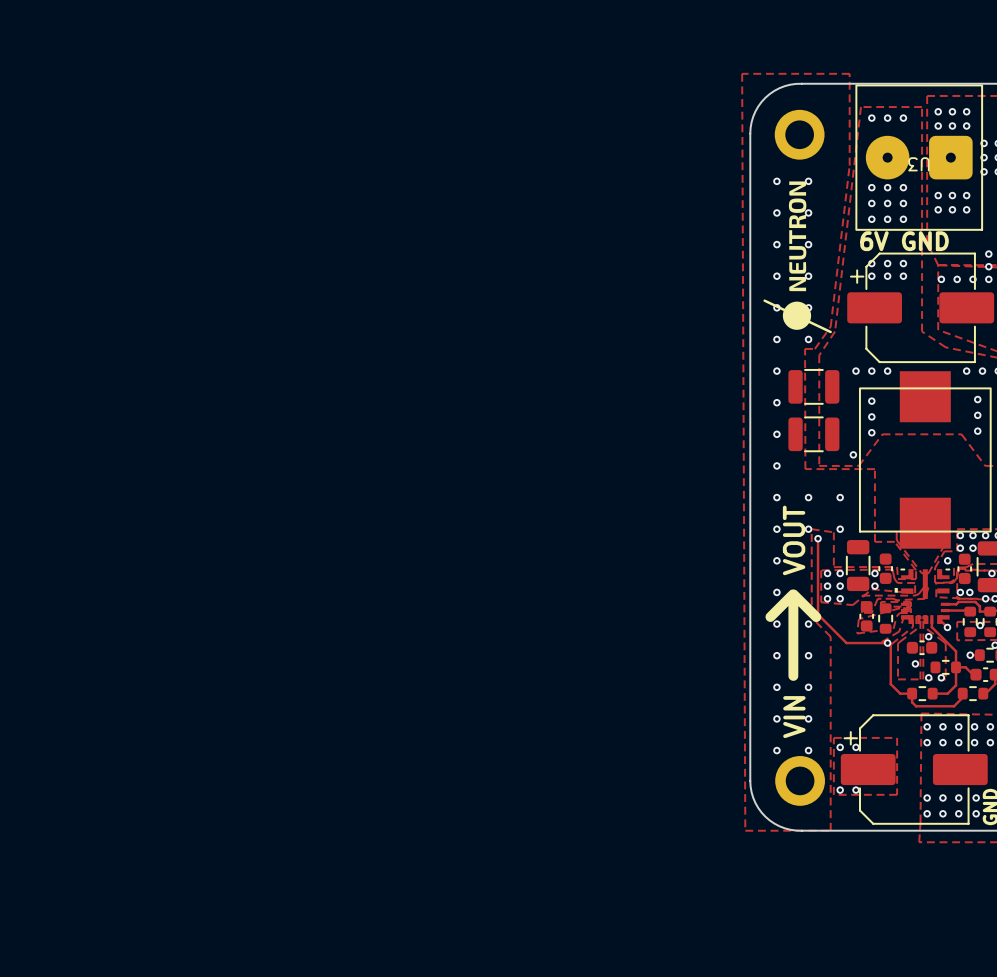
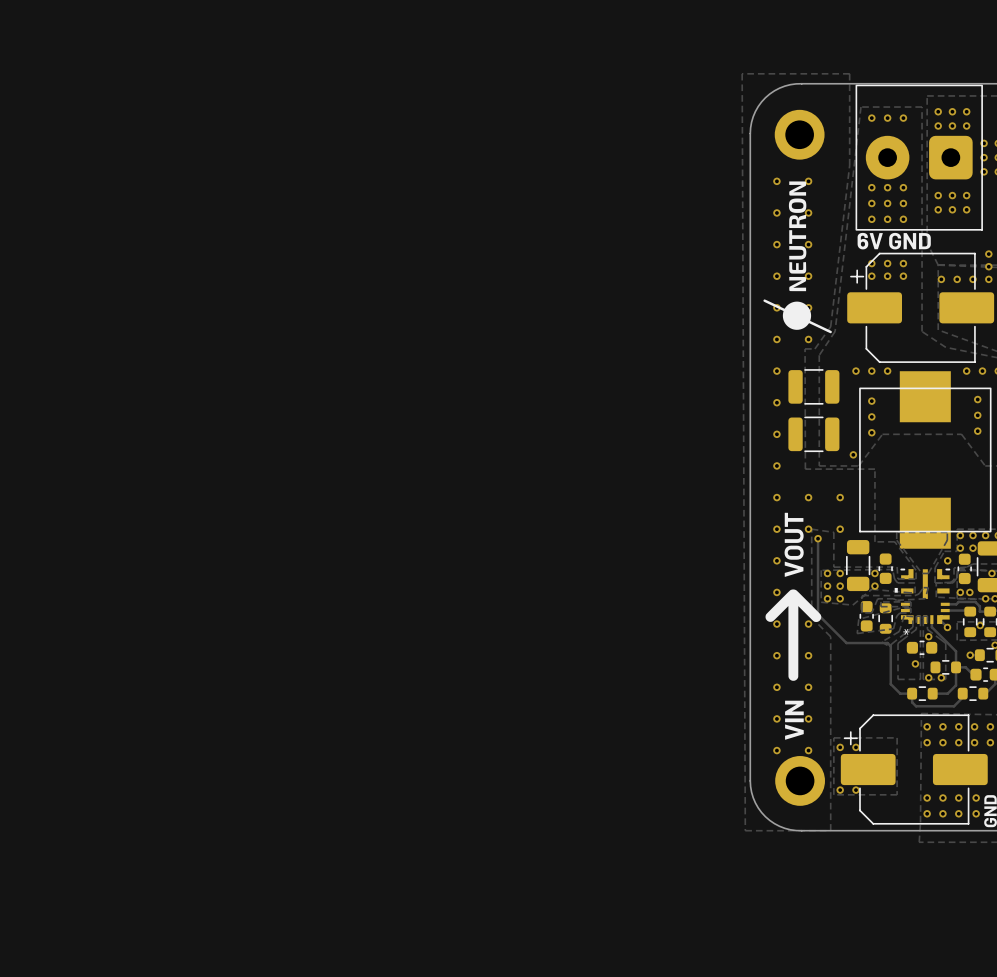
U3: (919, 157) -> none
part: none -> (919, 157)
part text: none -> * (906, 631)
via: (887, 643) -> none

